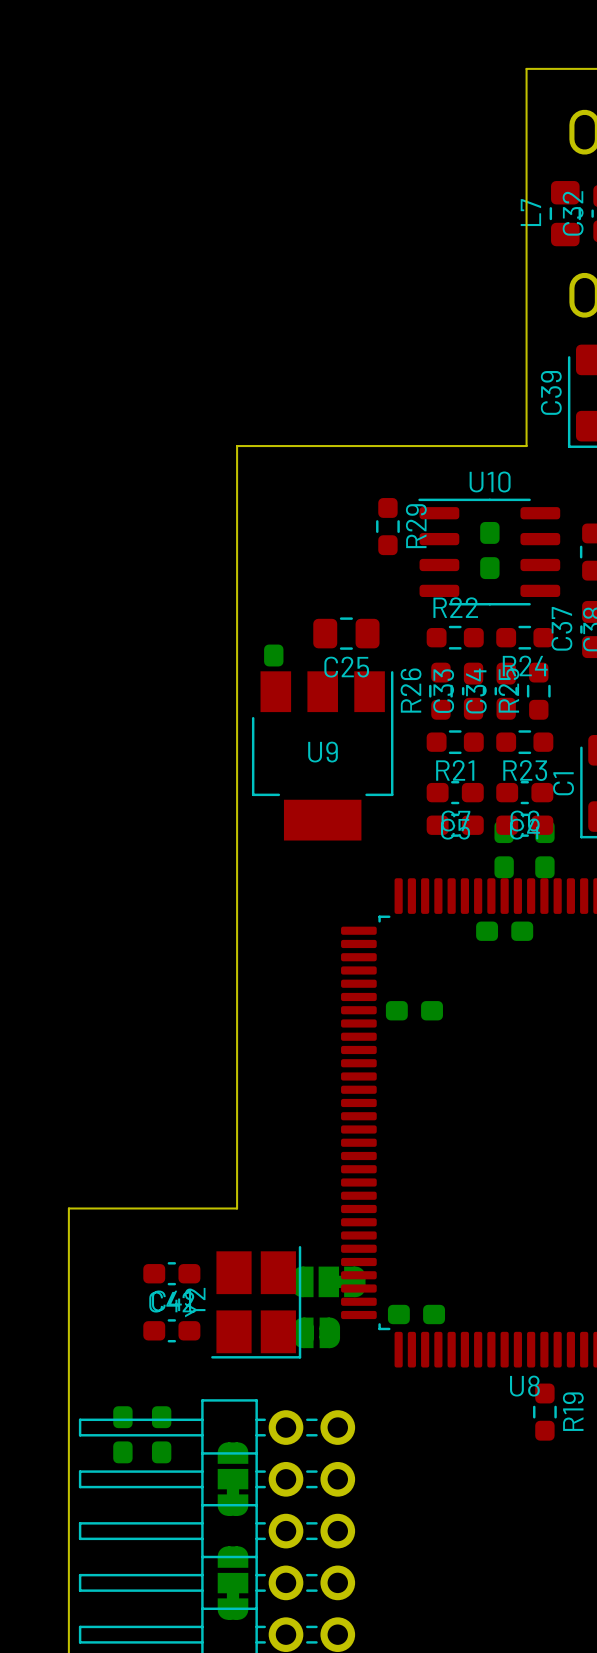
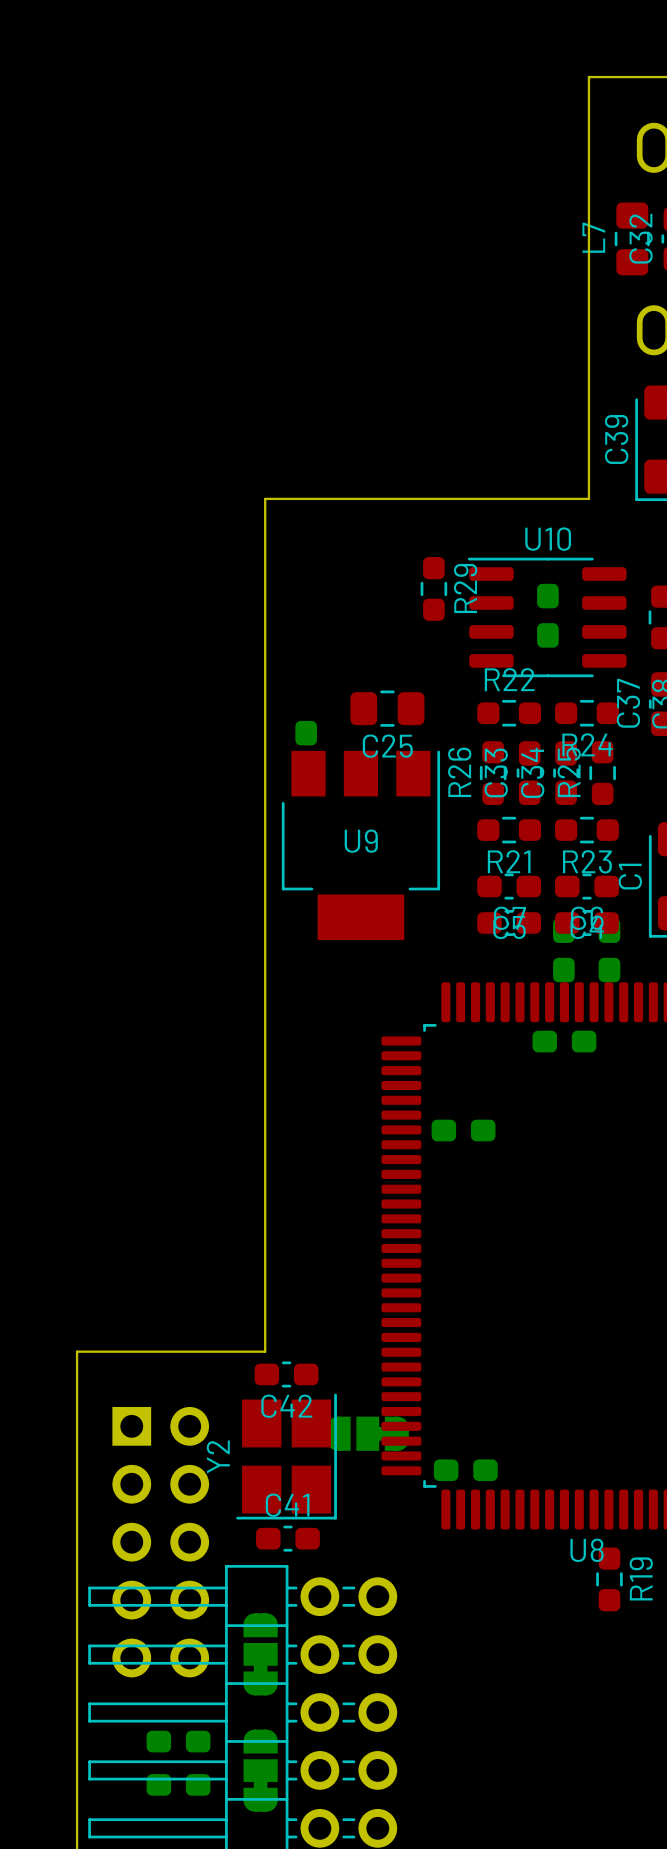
C42 position: (171, 1273) -> (286, 1374)
C41 position: (171, 1330) -> (287, 1538)
part: (316, 1332) -> none
part: none -> (160, 1542)
part: (122, 1434) -> none
part: (161, 1434) -> none
part: none -> (178, 1741)
part: none -> (178, 1784)

